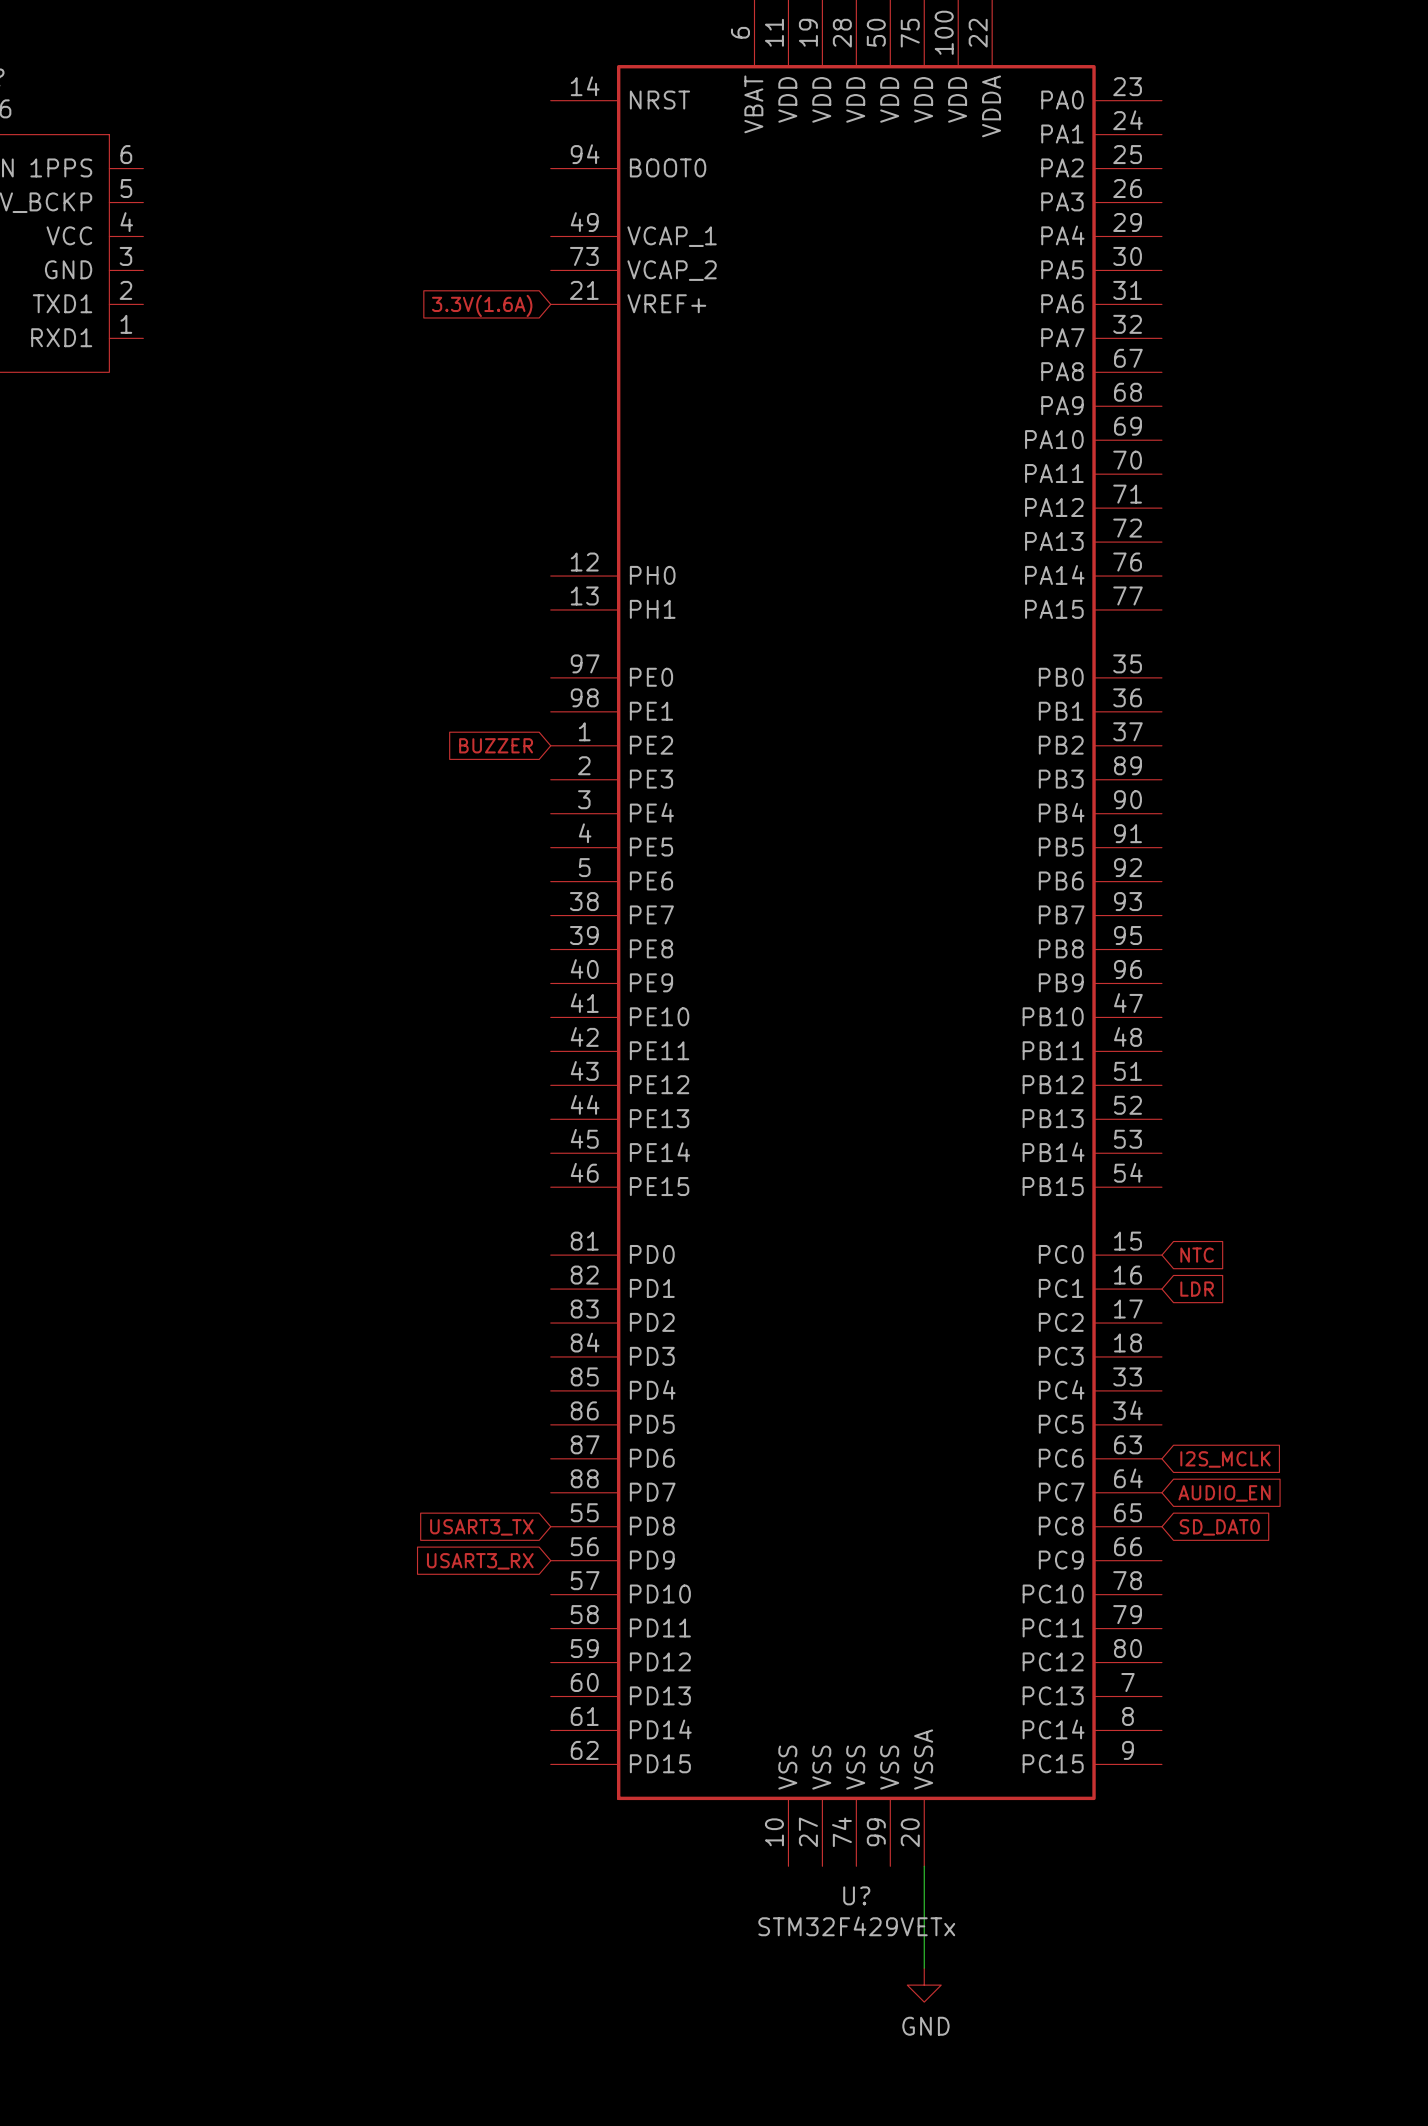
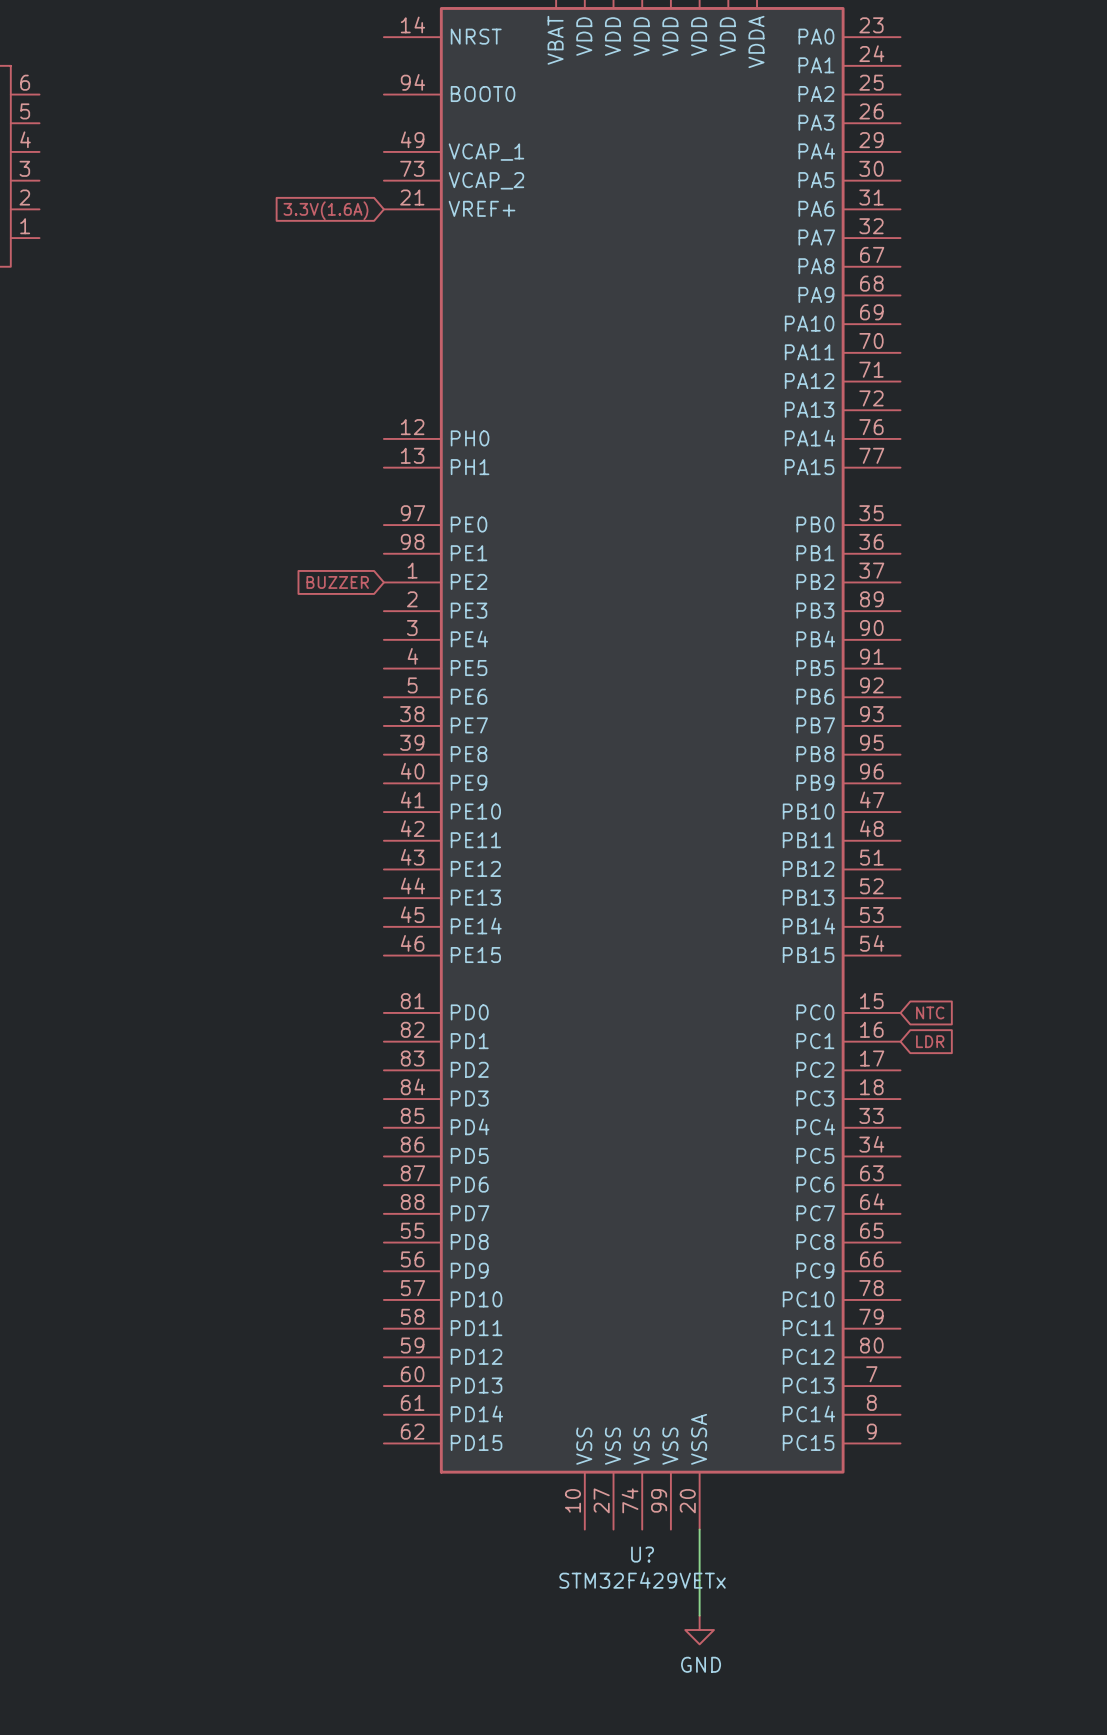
global label: I2S_MCLK (1225, 1459) -> none
global label: AUDIO_EN (1224, 1493) -> none
global label: USART3_TX (481, 1527) -> none
global label: SD_DAT0 (1219, 1527) -> none
global label: USART3_RX (480, 1561) -> none

